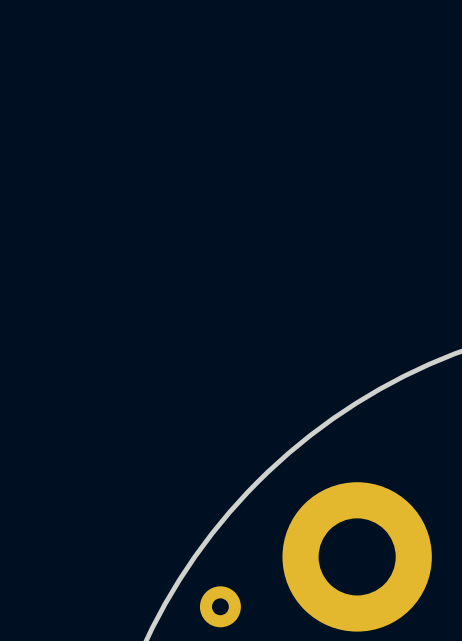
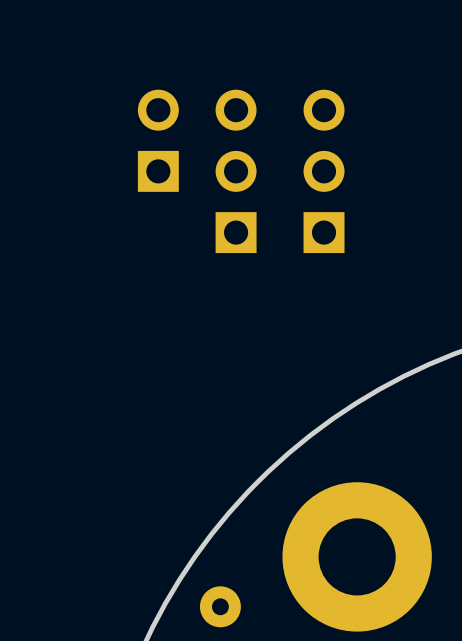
part: none -> (158, 140)
part: none -> (236, 171)
part: none -> (324, 171)

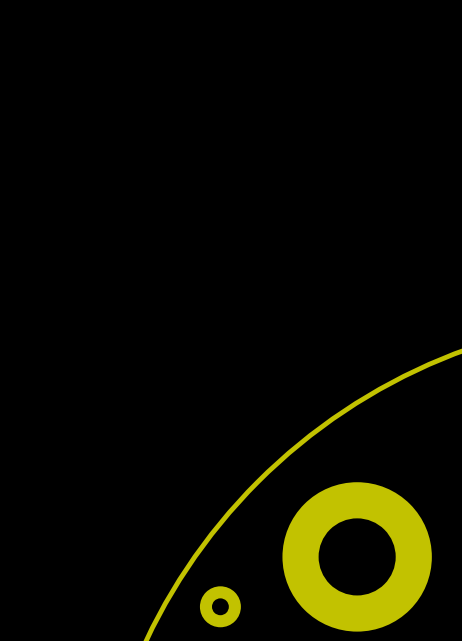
part: (158, 140) -> none
part: (236, 171) -> none
part: (324, 171) -> none

